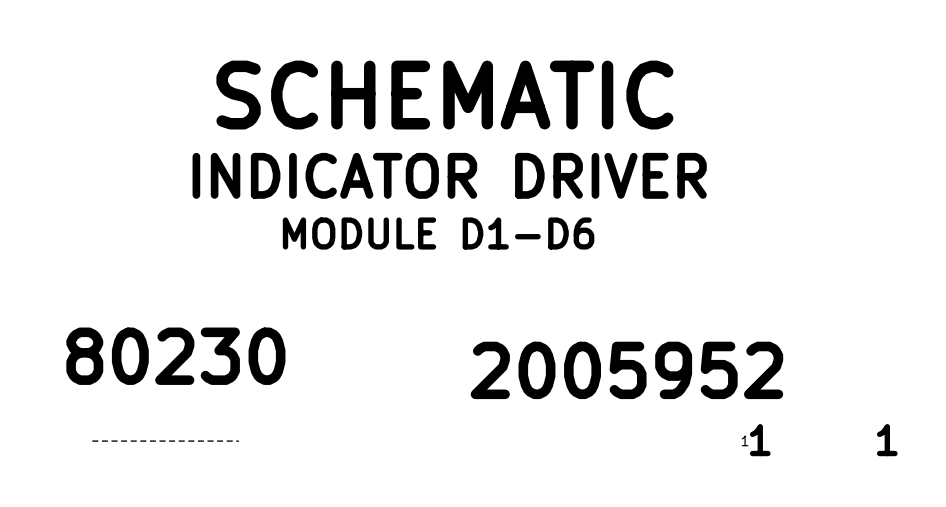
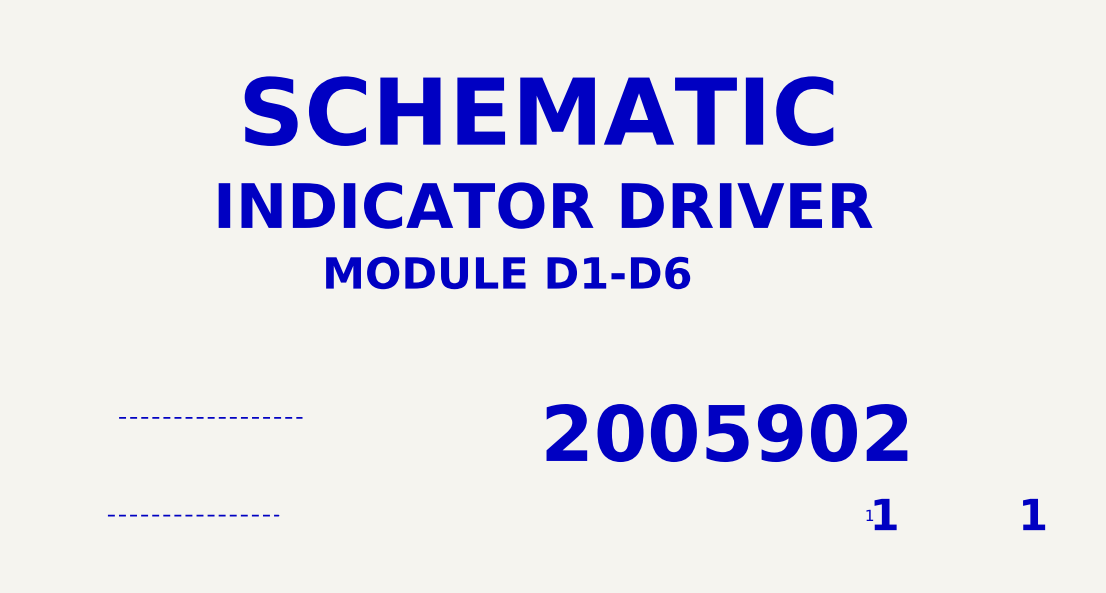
text: 80230 (175, 356) -> none
line: none -> (119, 417) (302, 417)
text: 2005952 (626, 370) -> 2005902 (726, 433)

